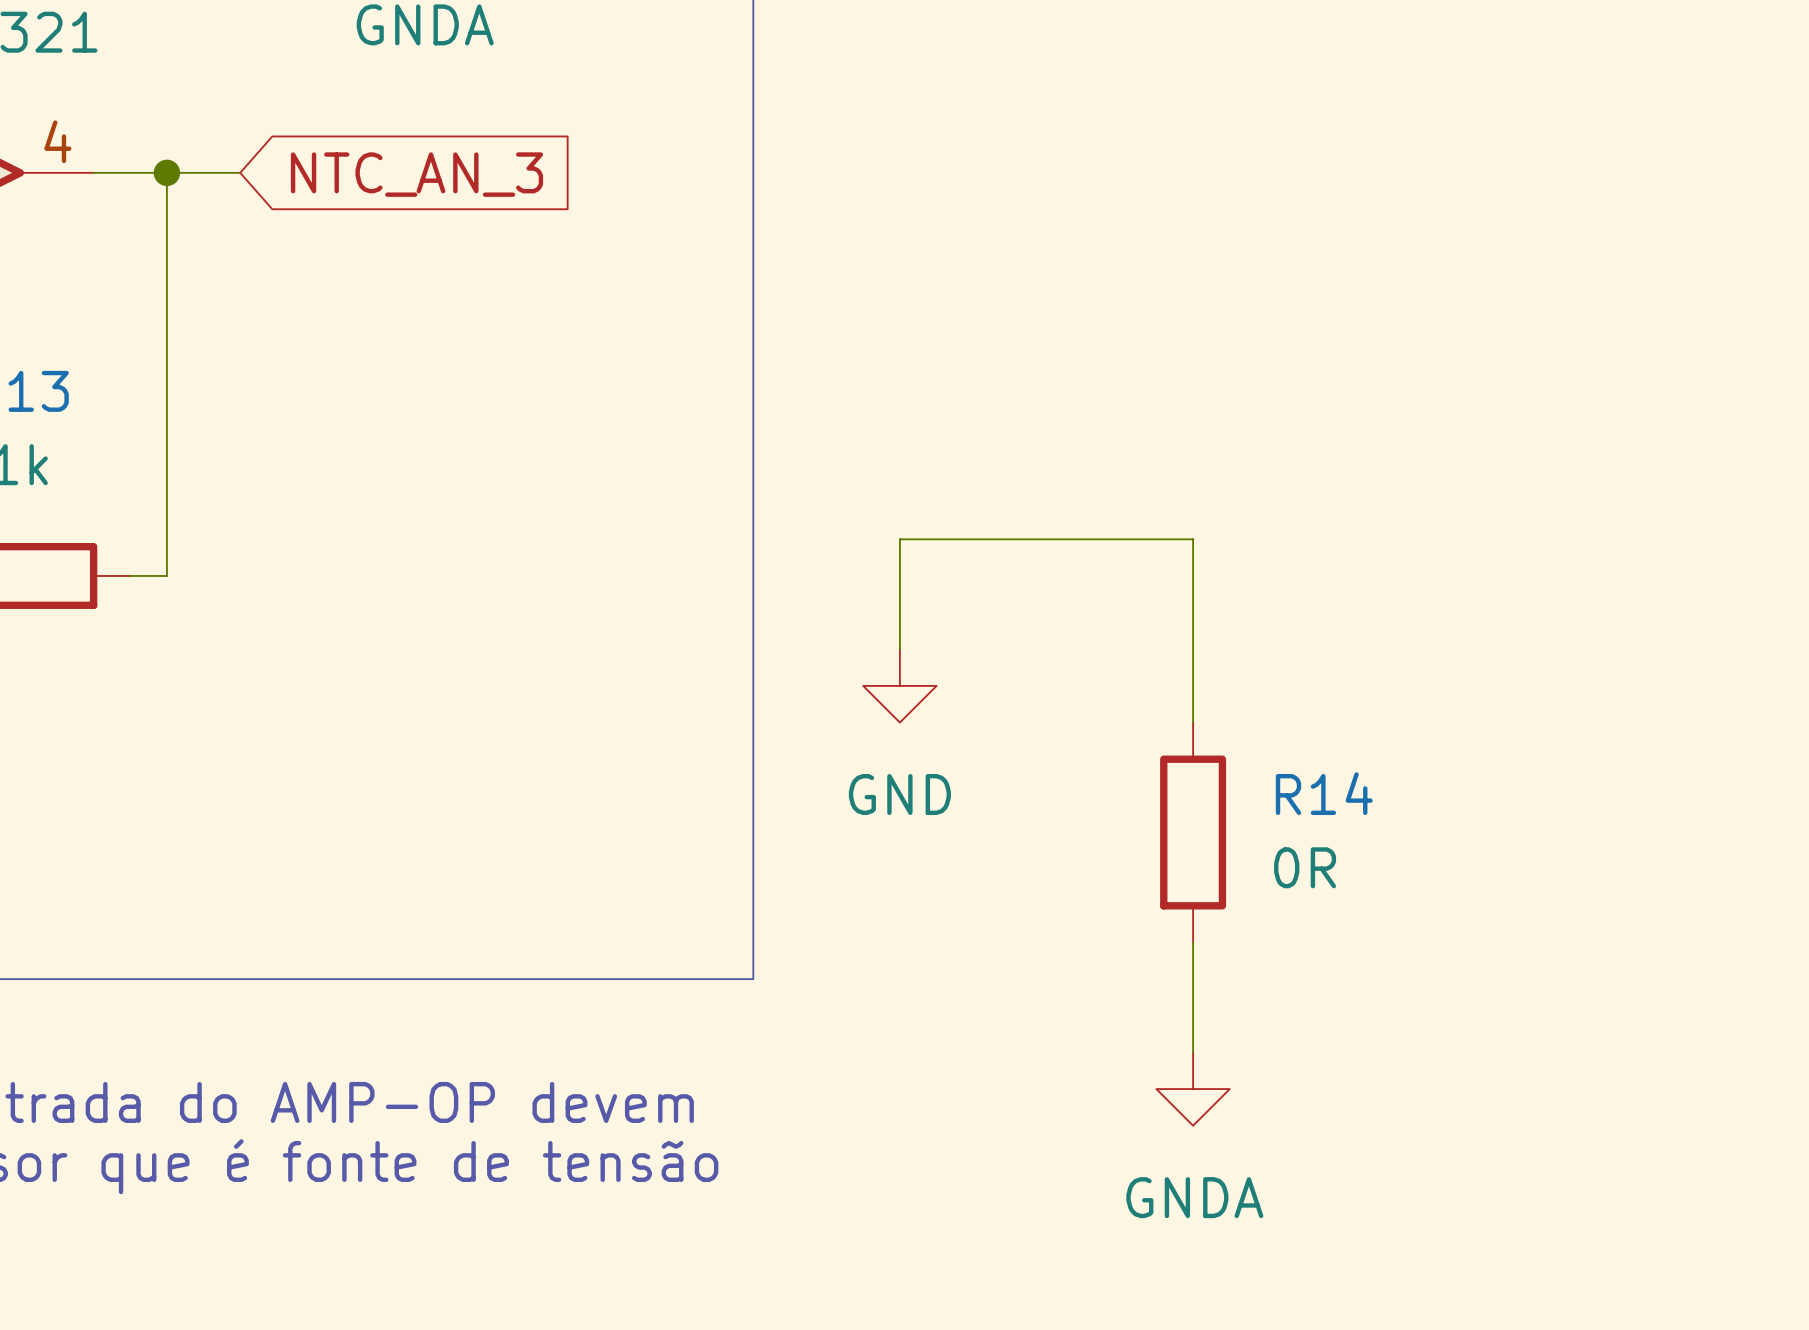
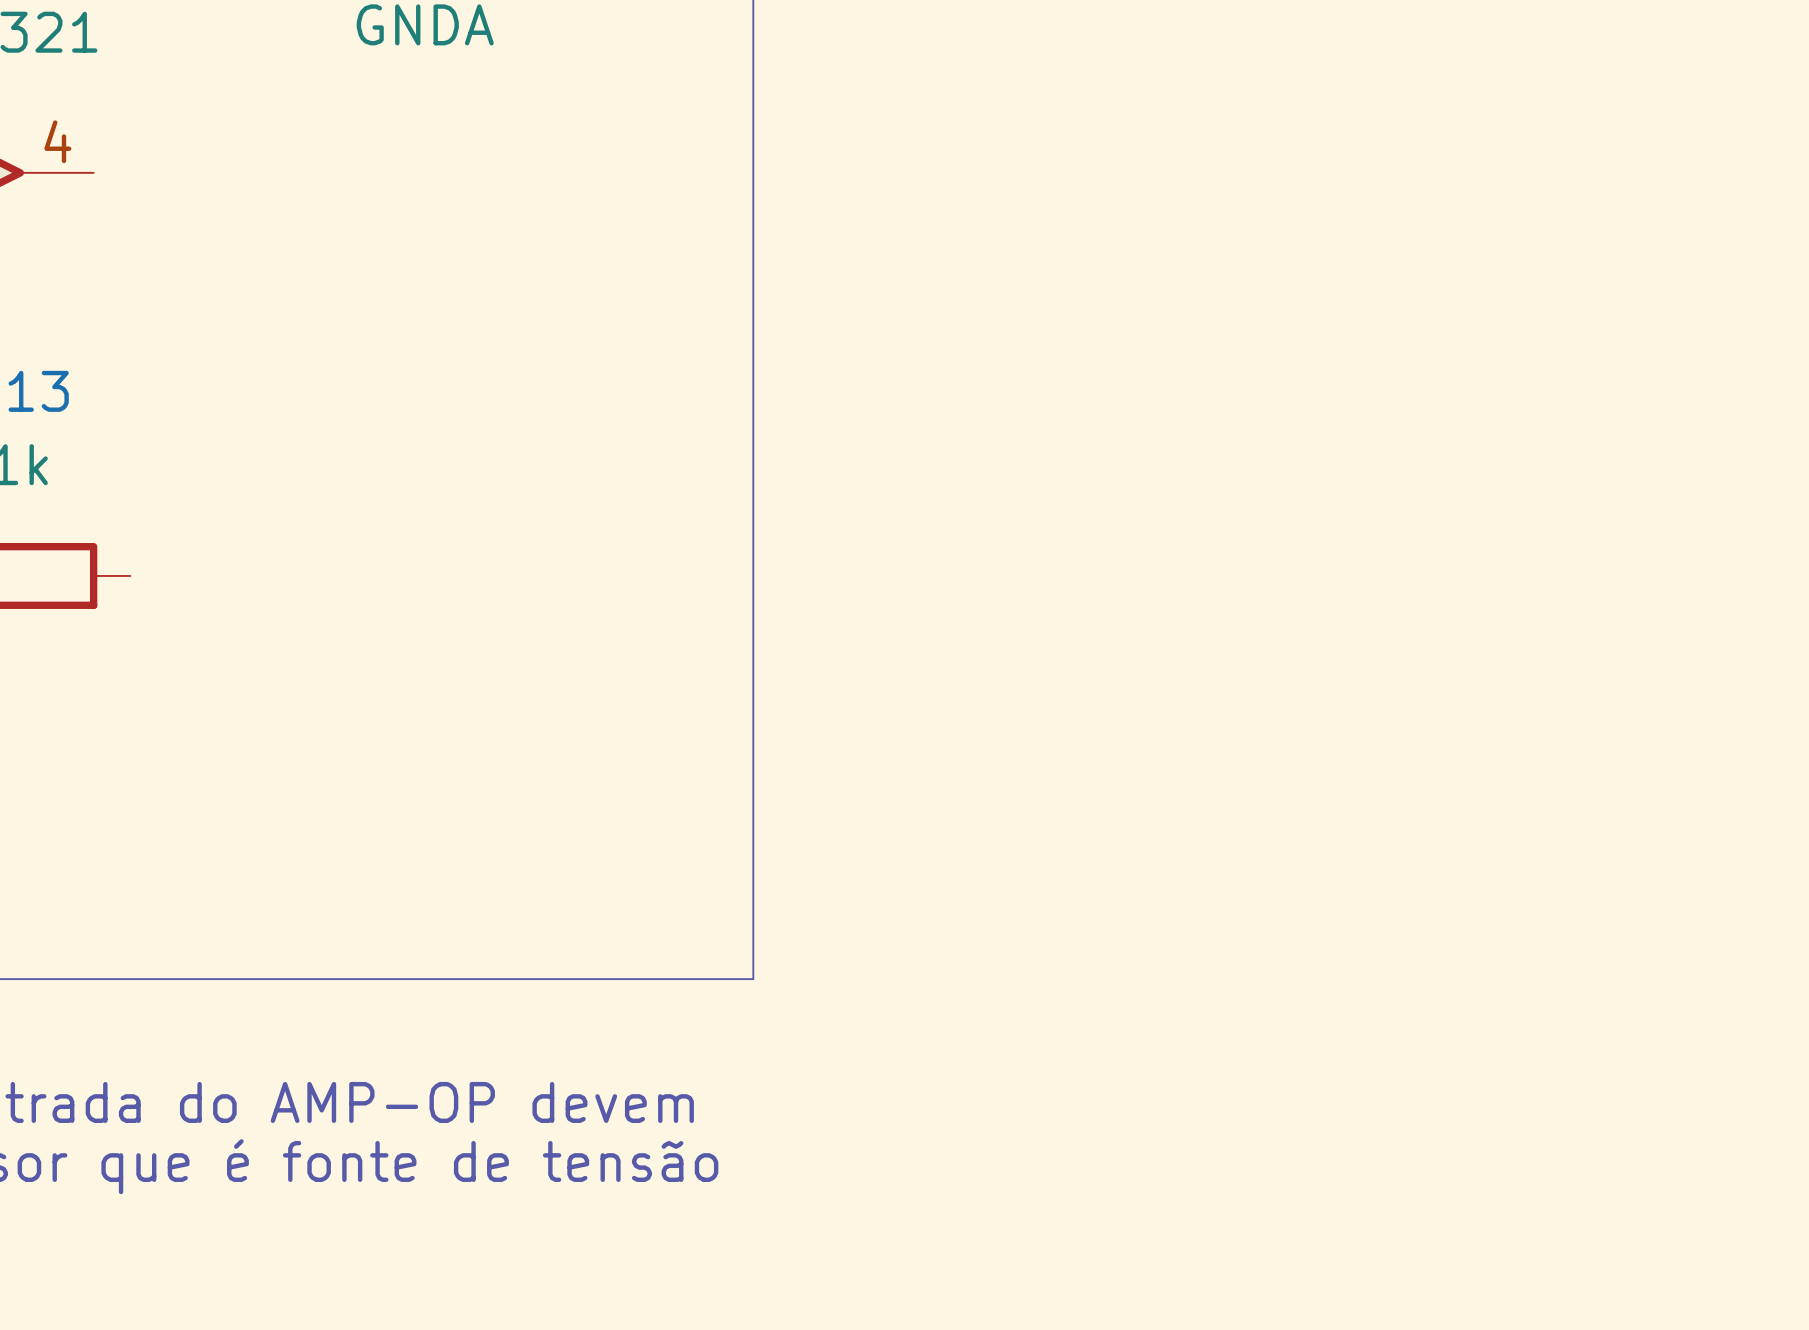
wire: (93, 172) (240, 172) -> none
wire: (166, 172) (166, 575) (130, 575) -> none
junction: (166, 172) -> none
global label: NTC_AN_3 (416, 174) -> none
wire: (899, 649) (899, 539) (1193, 539) (1193, 722) -> none
power symbol: GND (899, 685) -> none
R14: 0R (1193, 832) -> none
wire: (1193, 942) (1193, 1052) -> none
power symbol: GNDA (1193, 1089) -> none

